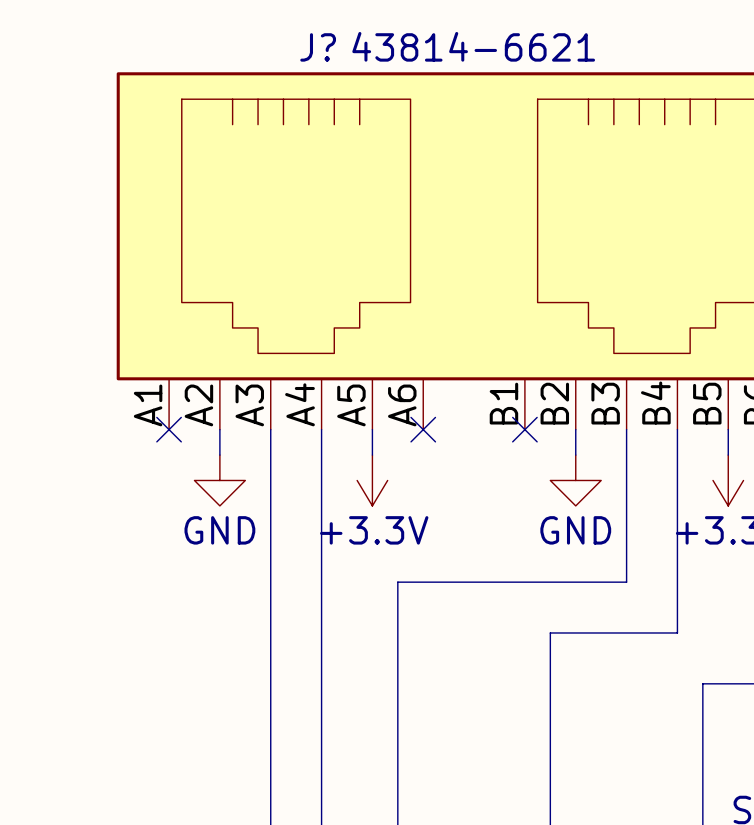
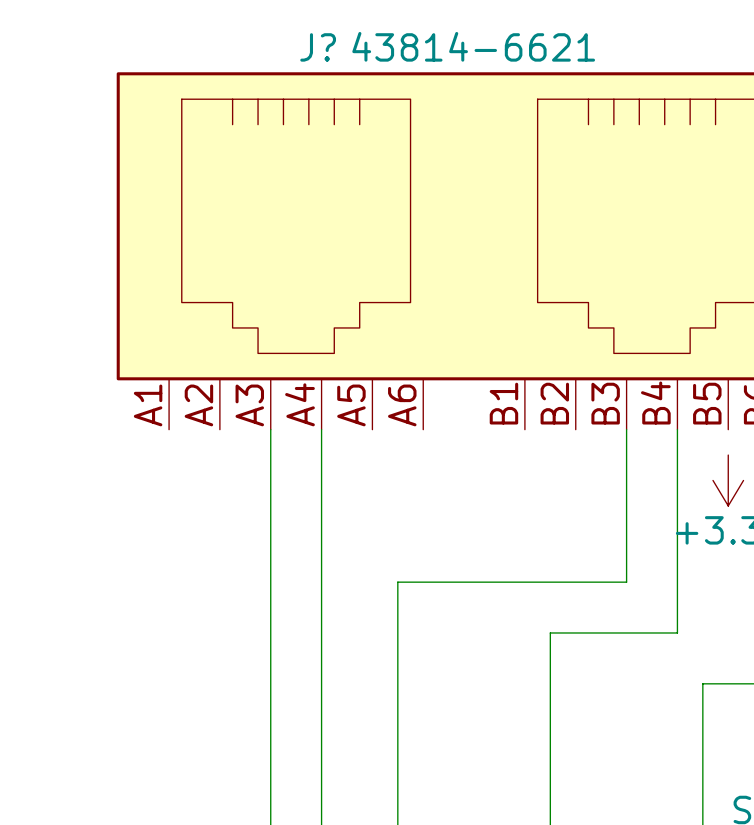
no-connect mark: (169, 429) -> none
wire: (219, 429) (219, 455) -> none
wire: (372, 429) (372, 455) -> none
no-connect mark: (423, 429) -> none
no-connect mark: (524, 429) -> none
wire: (575, 429) (575, 455) -> none
wire: (728, 429) (728, 455) -> none
power symbol: GND (219, 480) -> none
power symbol: +3.3V (372, 480) -> none
power symbol: GND (575, 480) -> none

